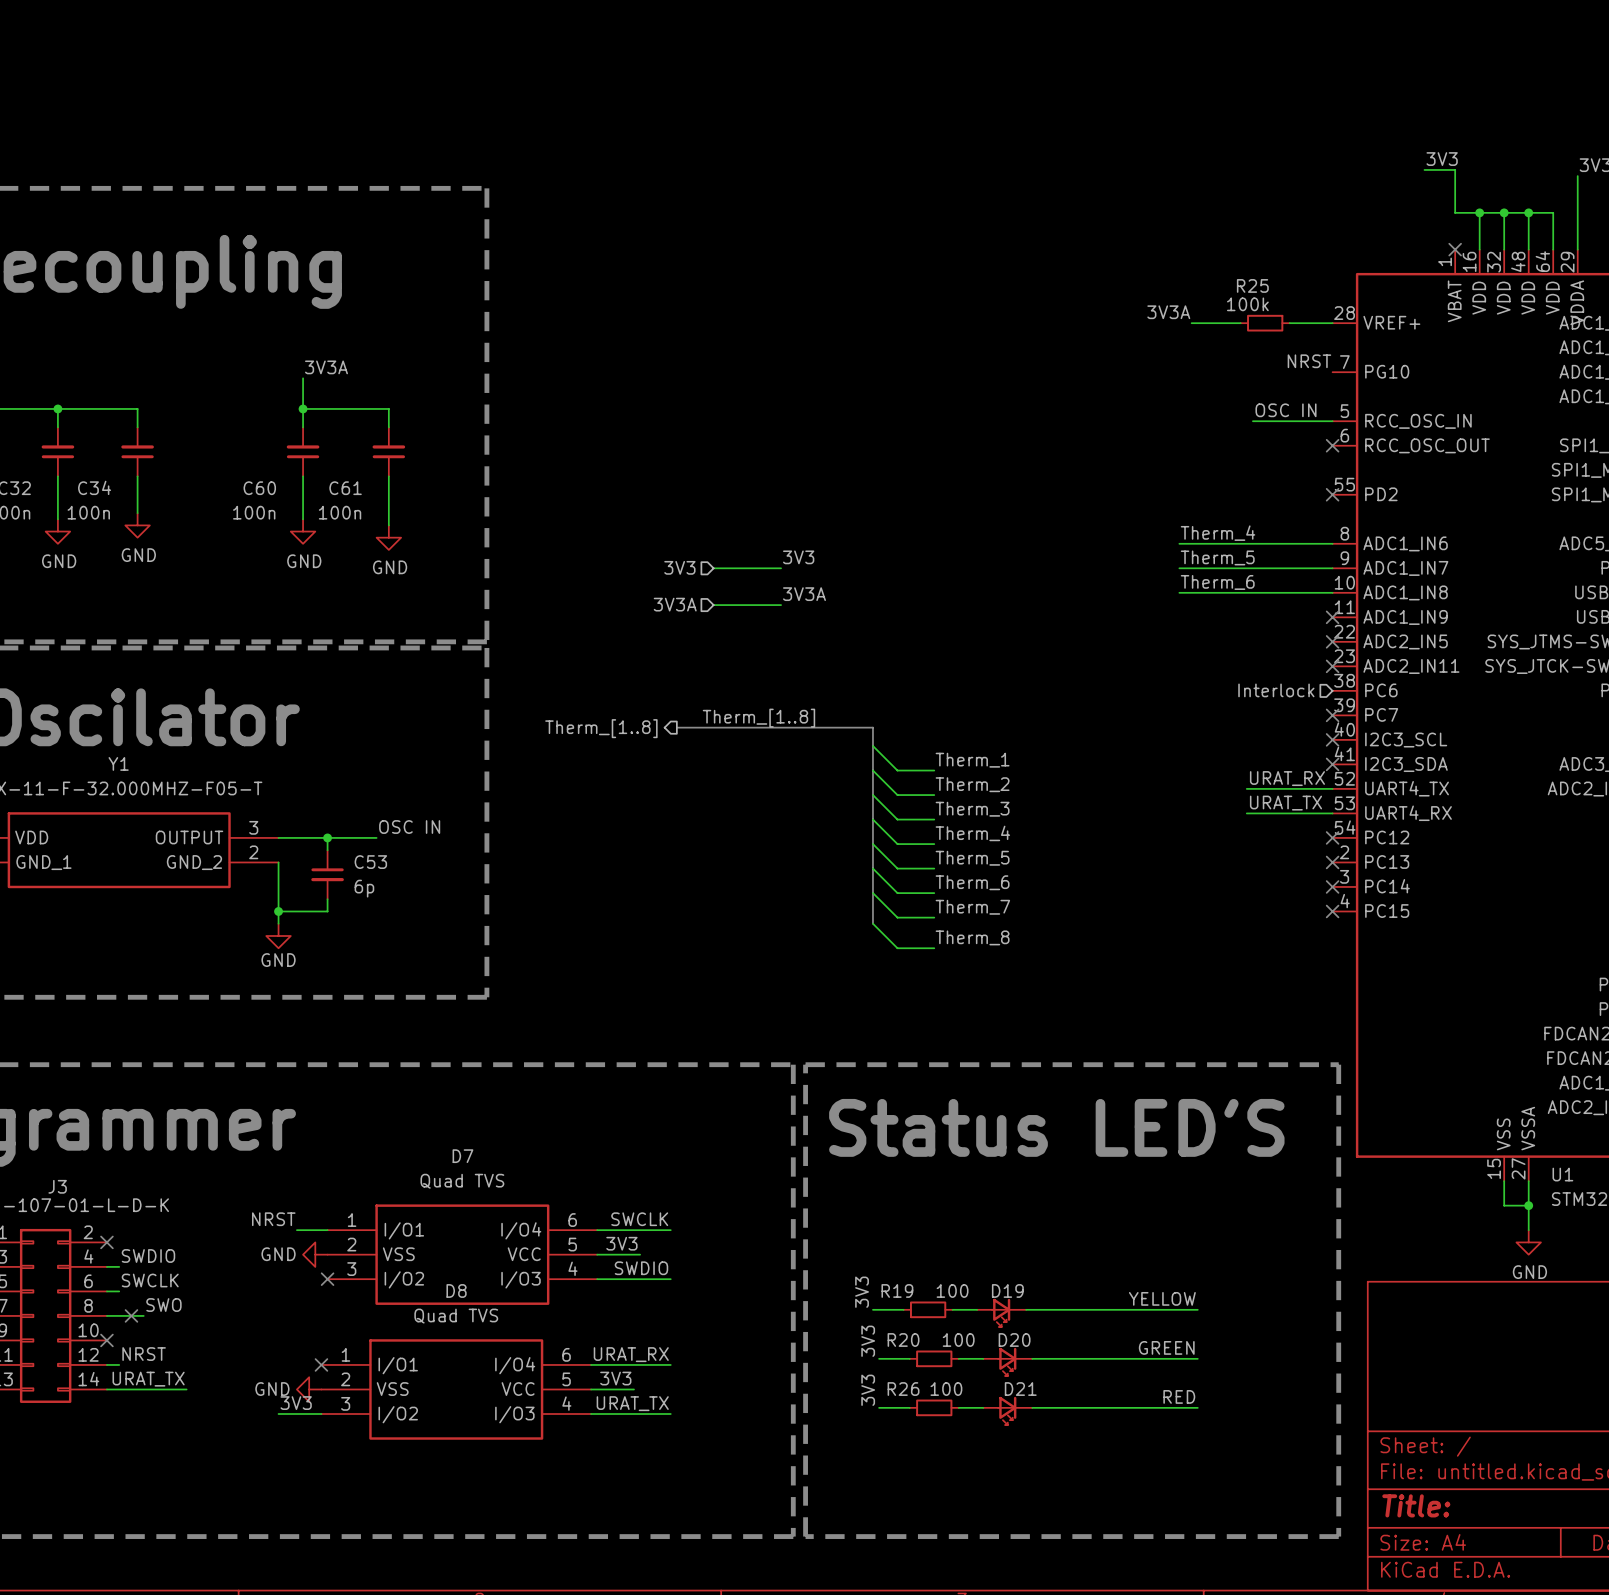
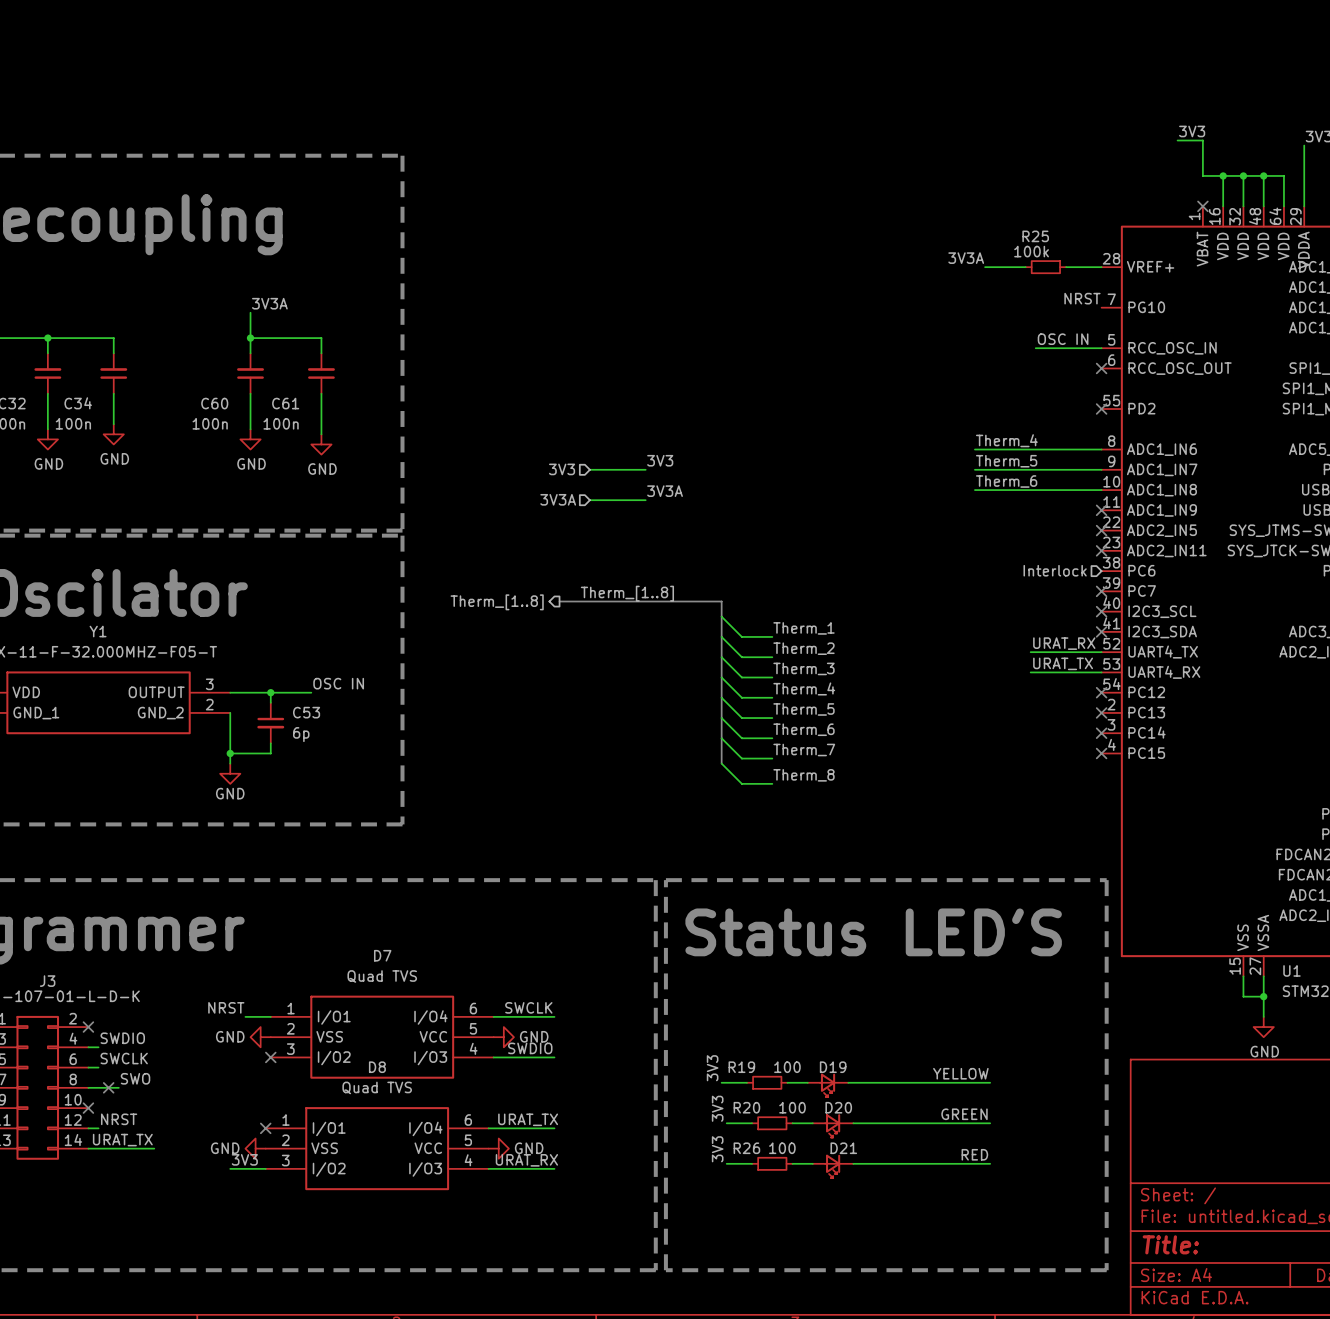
label: 3V3 (621, 1243) -> none
wire: (597, 1254) (640, 1254) -> none
power symbol: none -> GND (503, 1037)
label: URAT_RX (631, 1354) -> URAT_TX (528, 1119)
label: 3V3 (615, 1378) -> none
wire: (591, 1389) (633, 1389) -> none
power symbol: none -> GND (498, 1148)
label: URAT_TX (632, 1403) -> URAT_RX (526, 1160)

